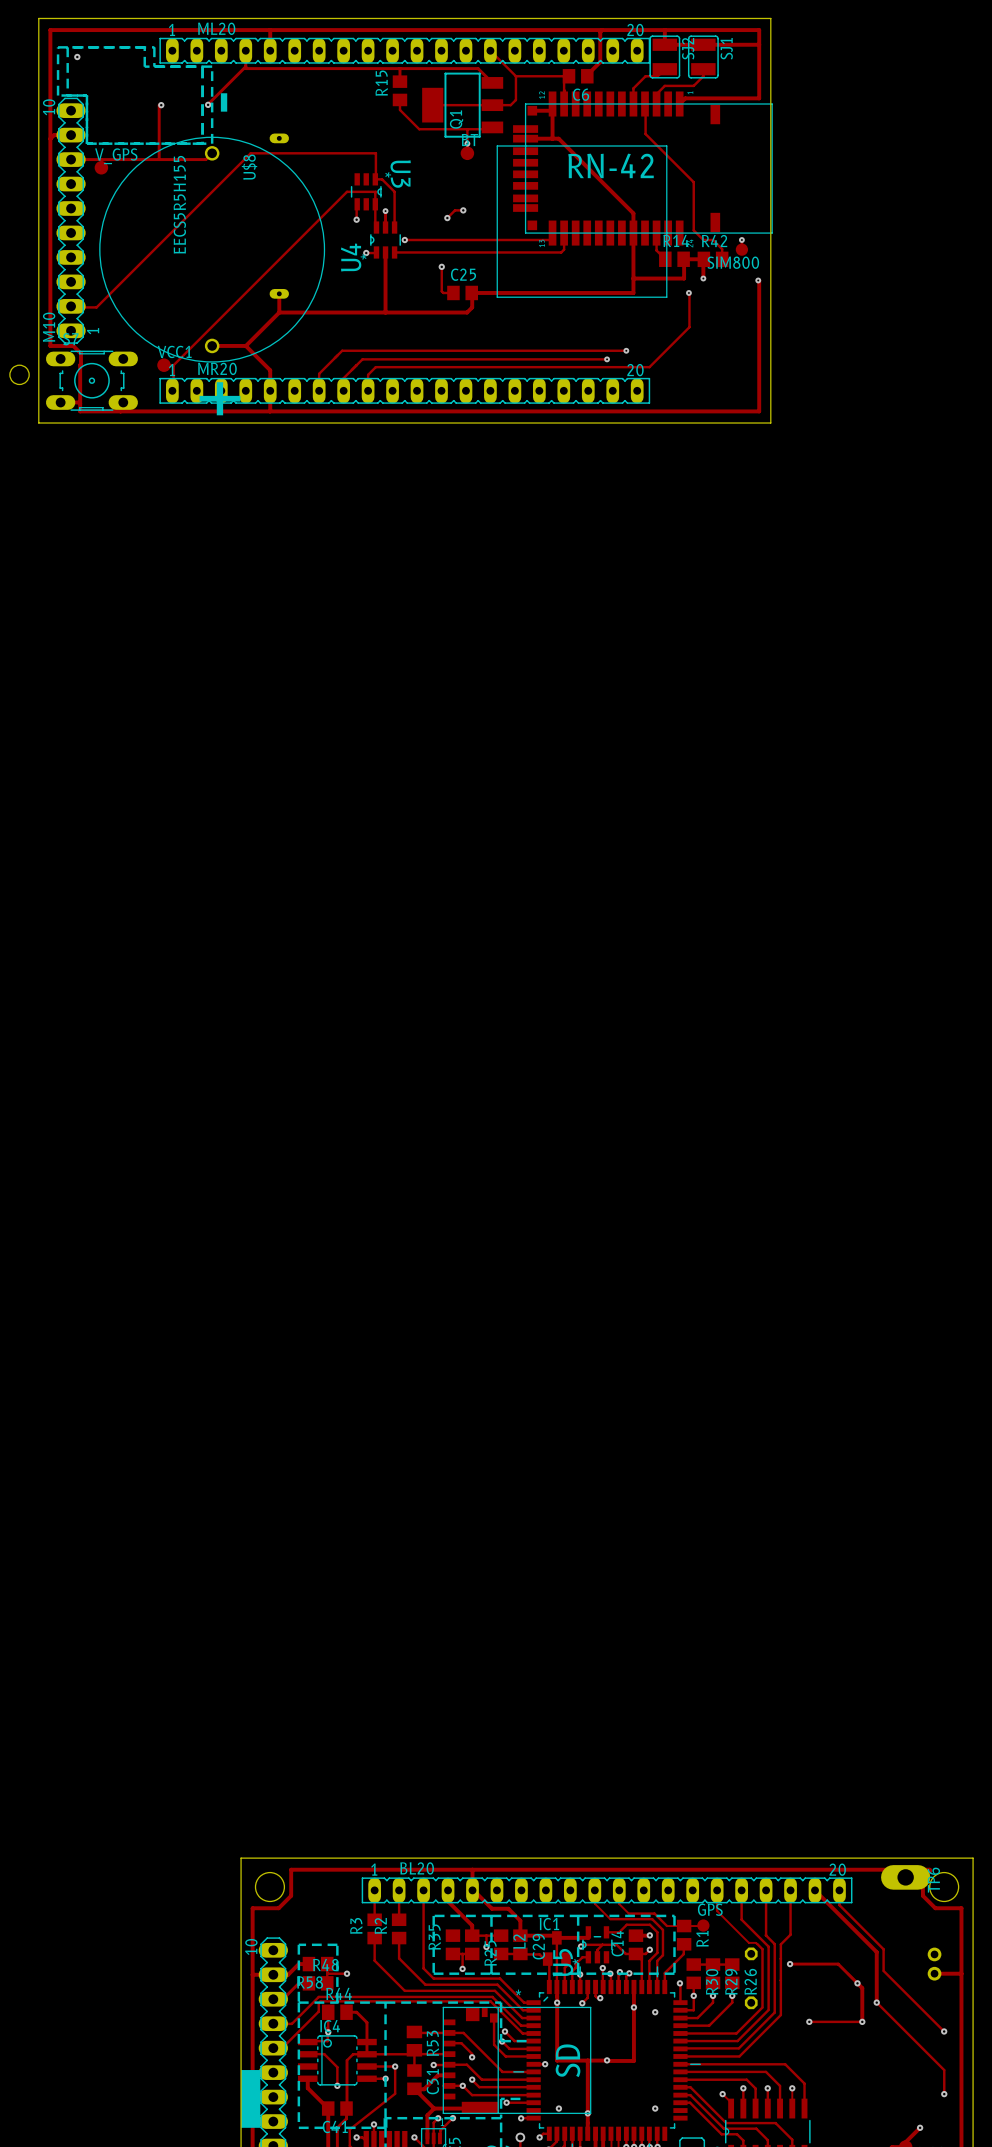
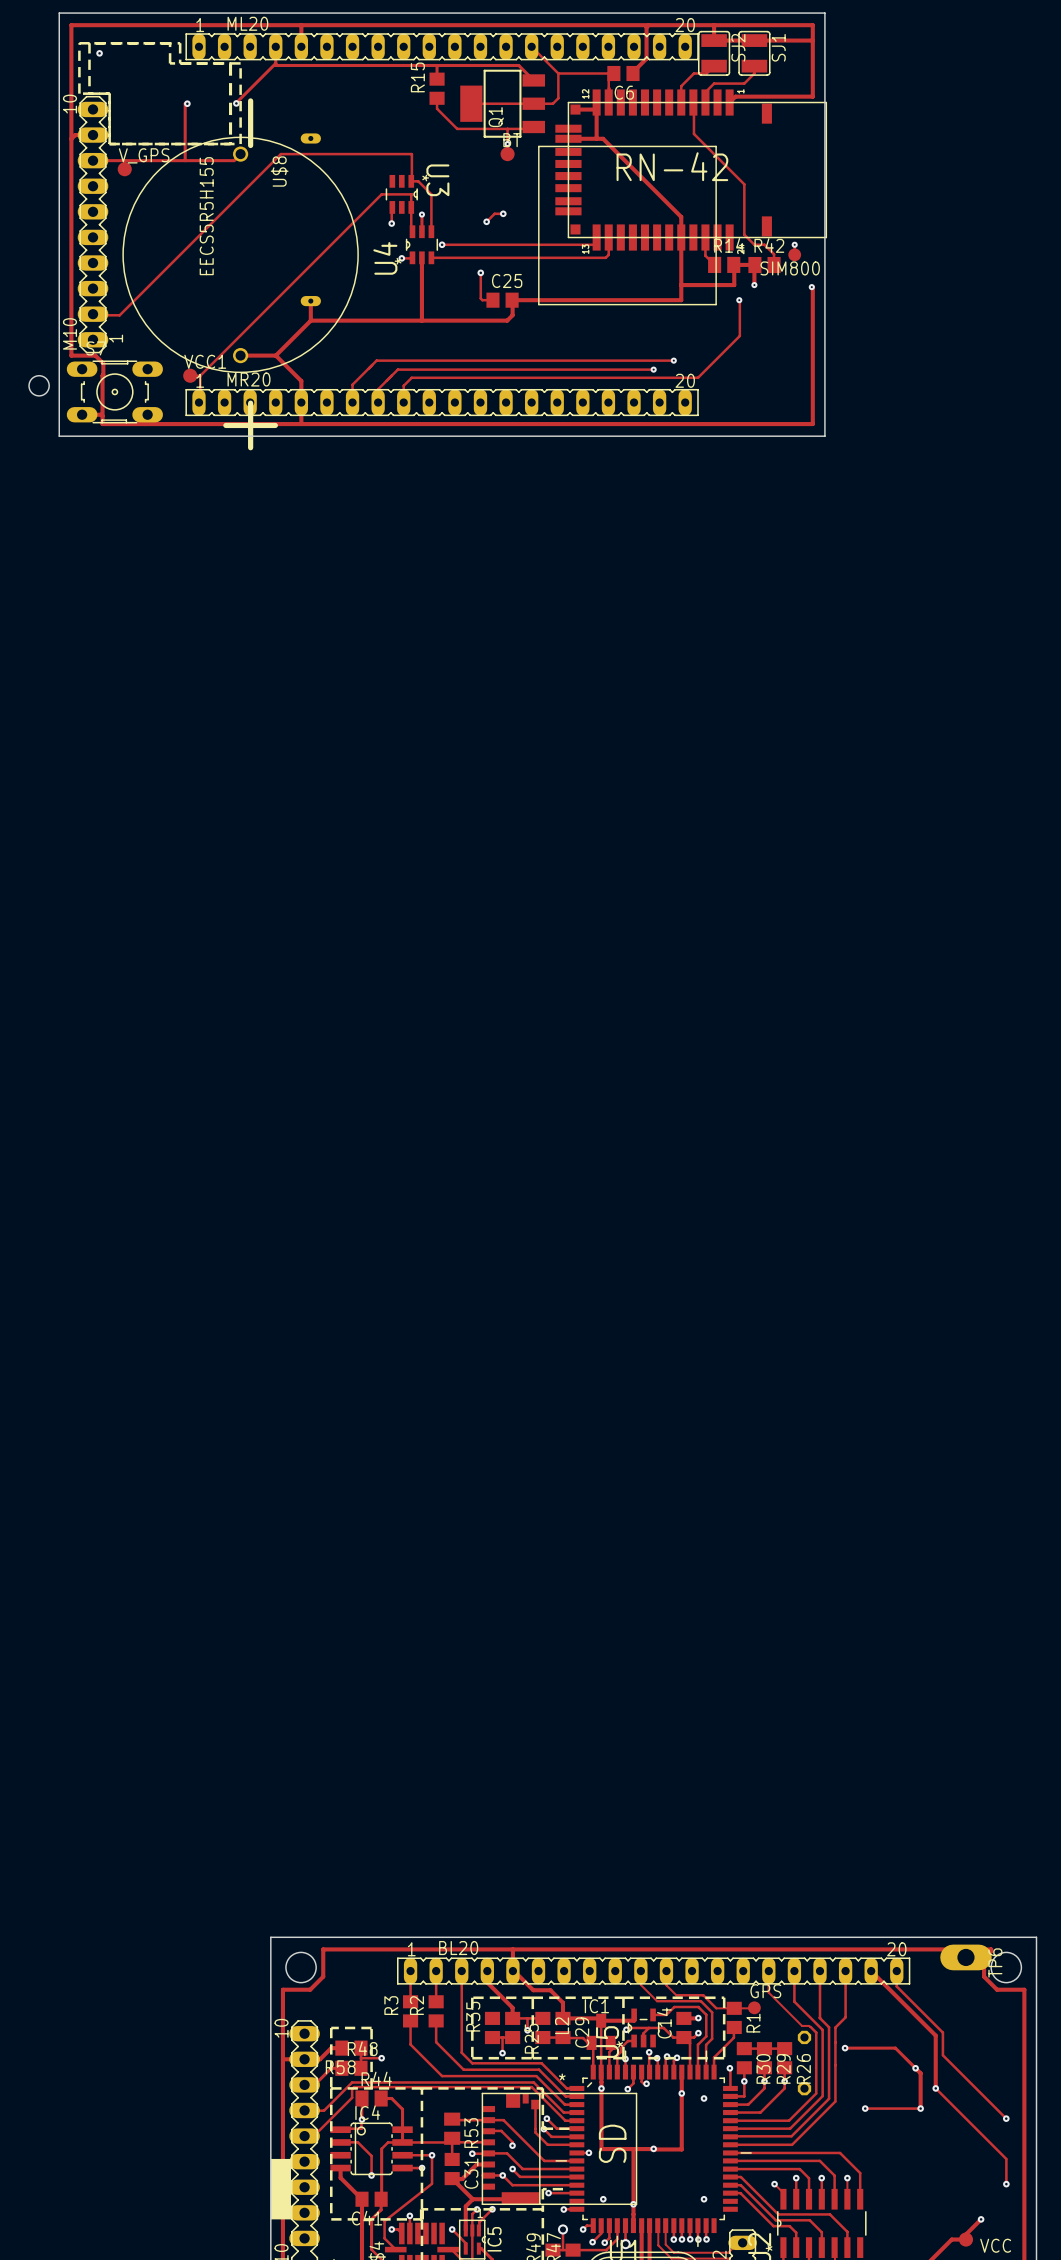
part: (934, 1964) -> none
track: (934, 1973) (961, 1973) -> none

